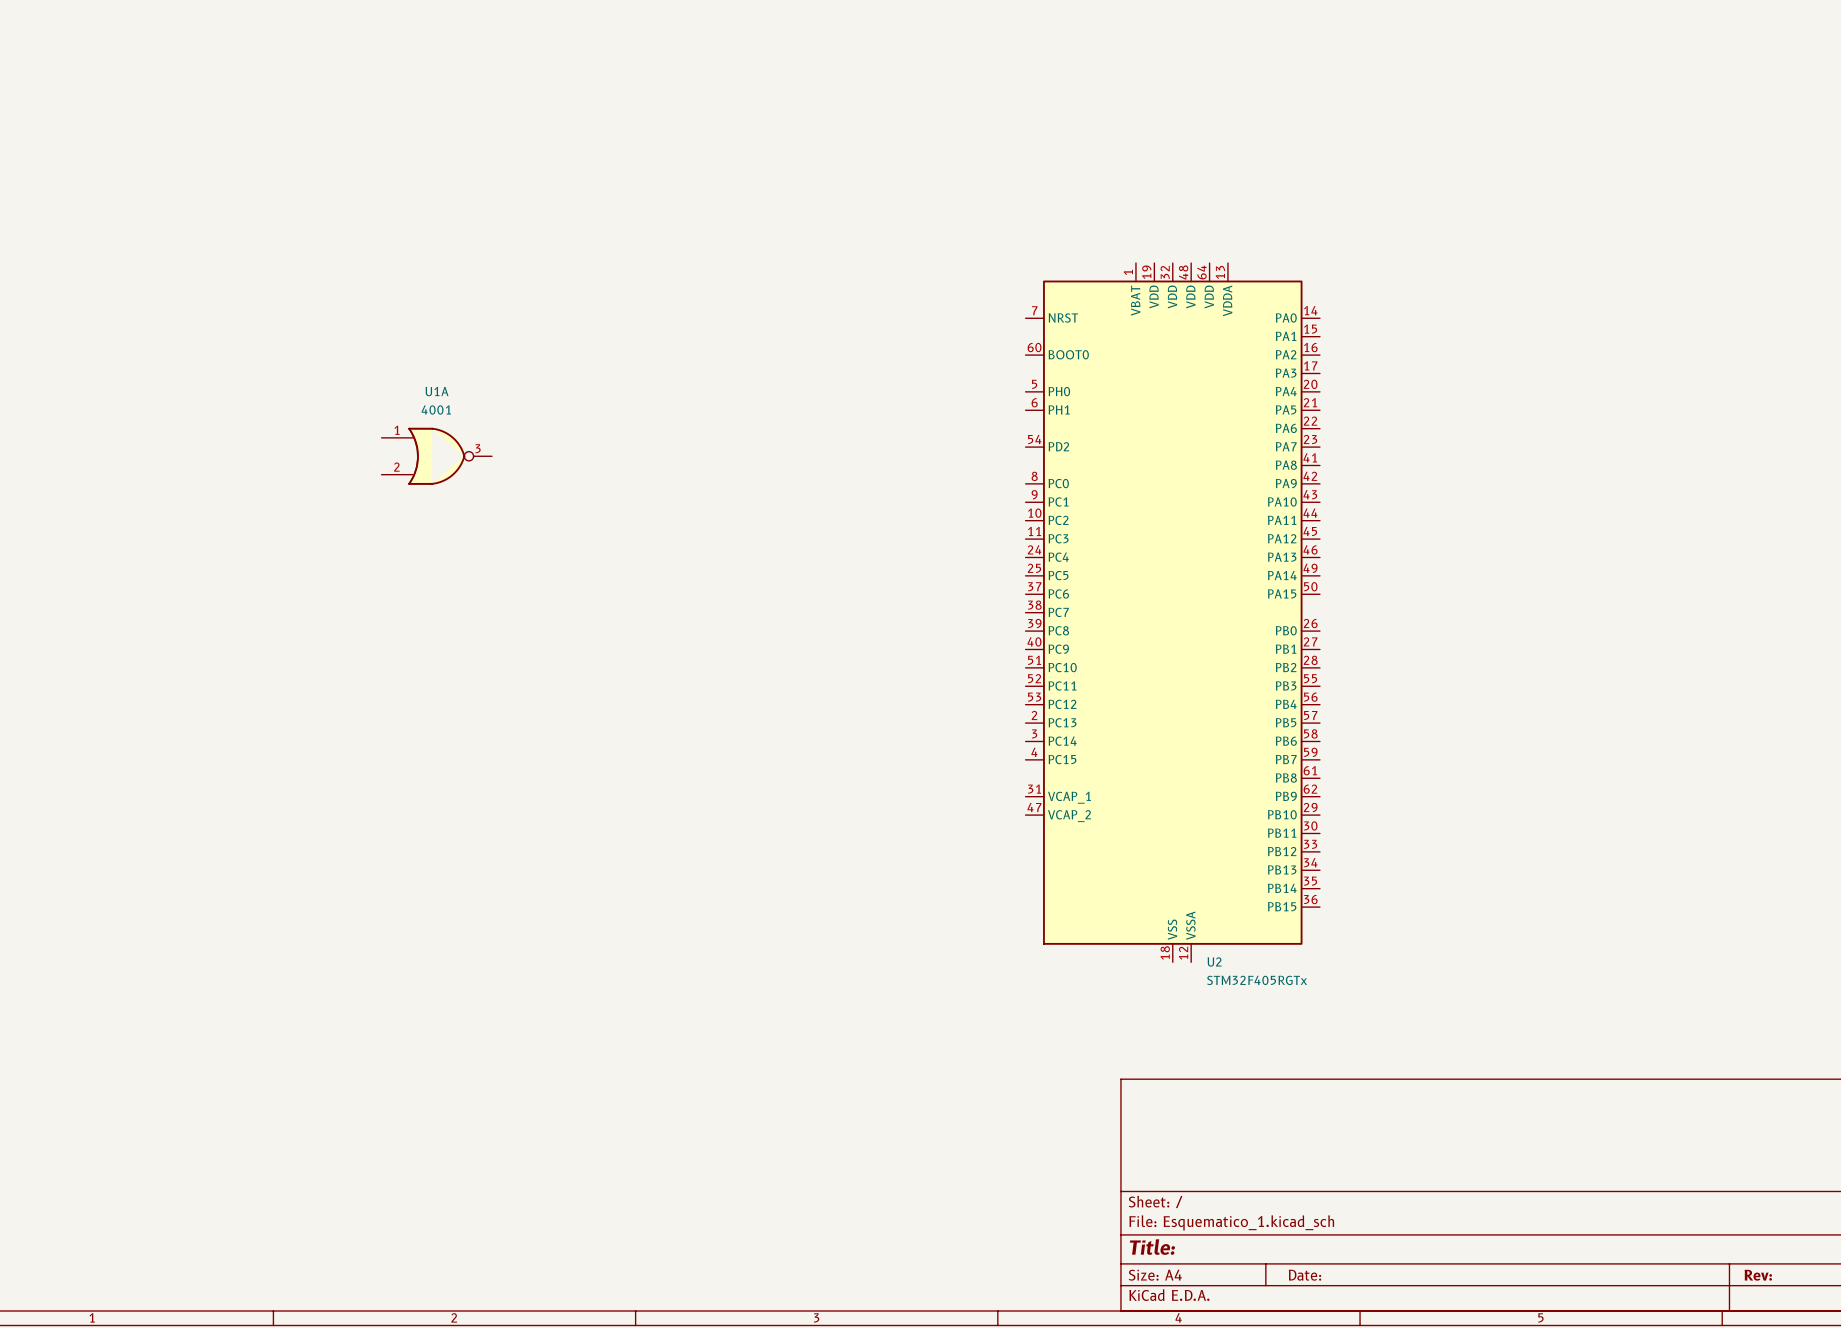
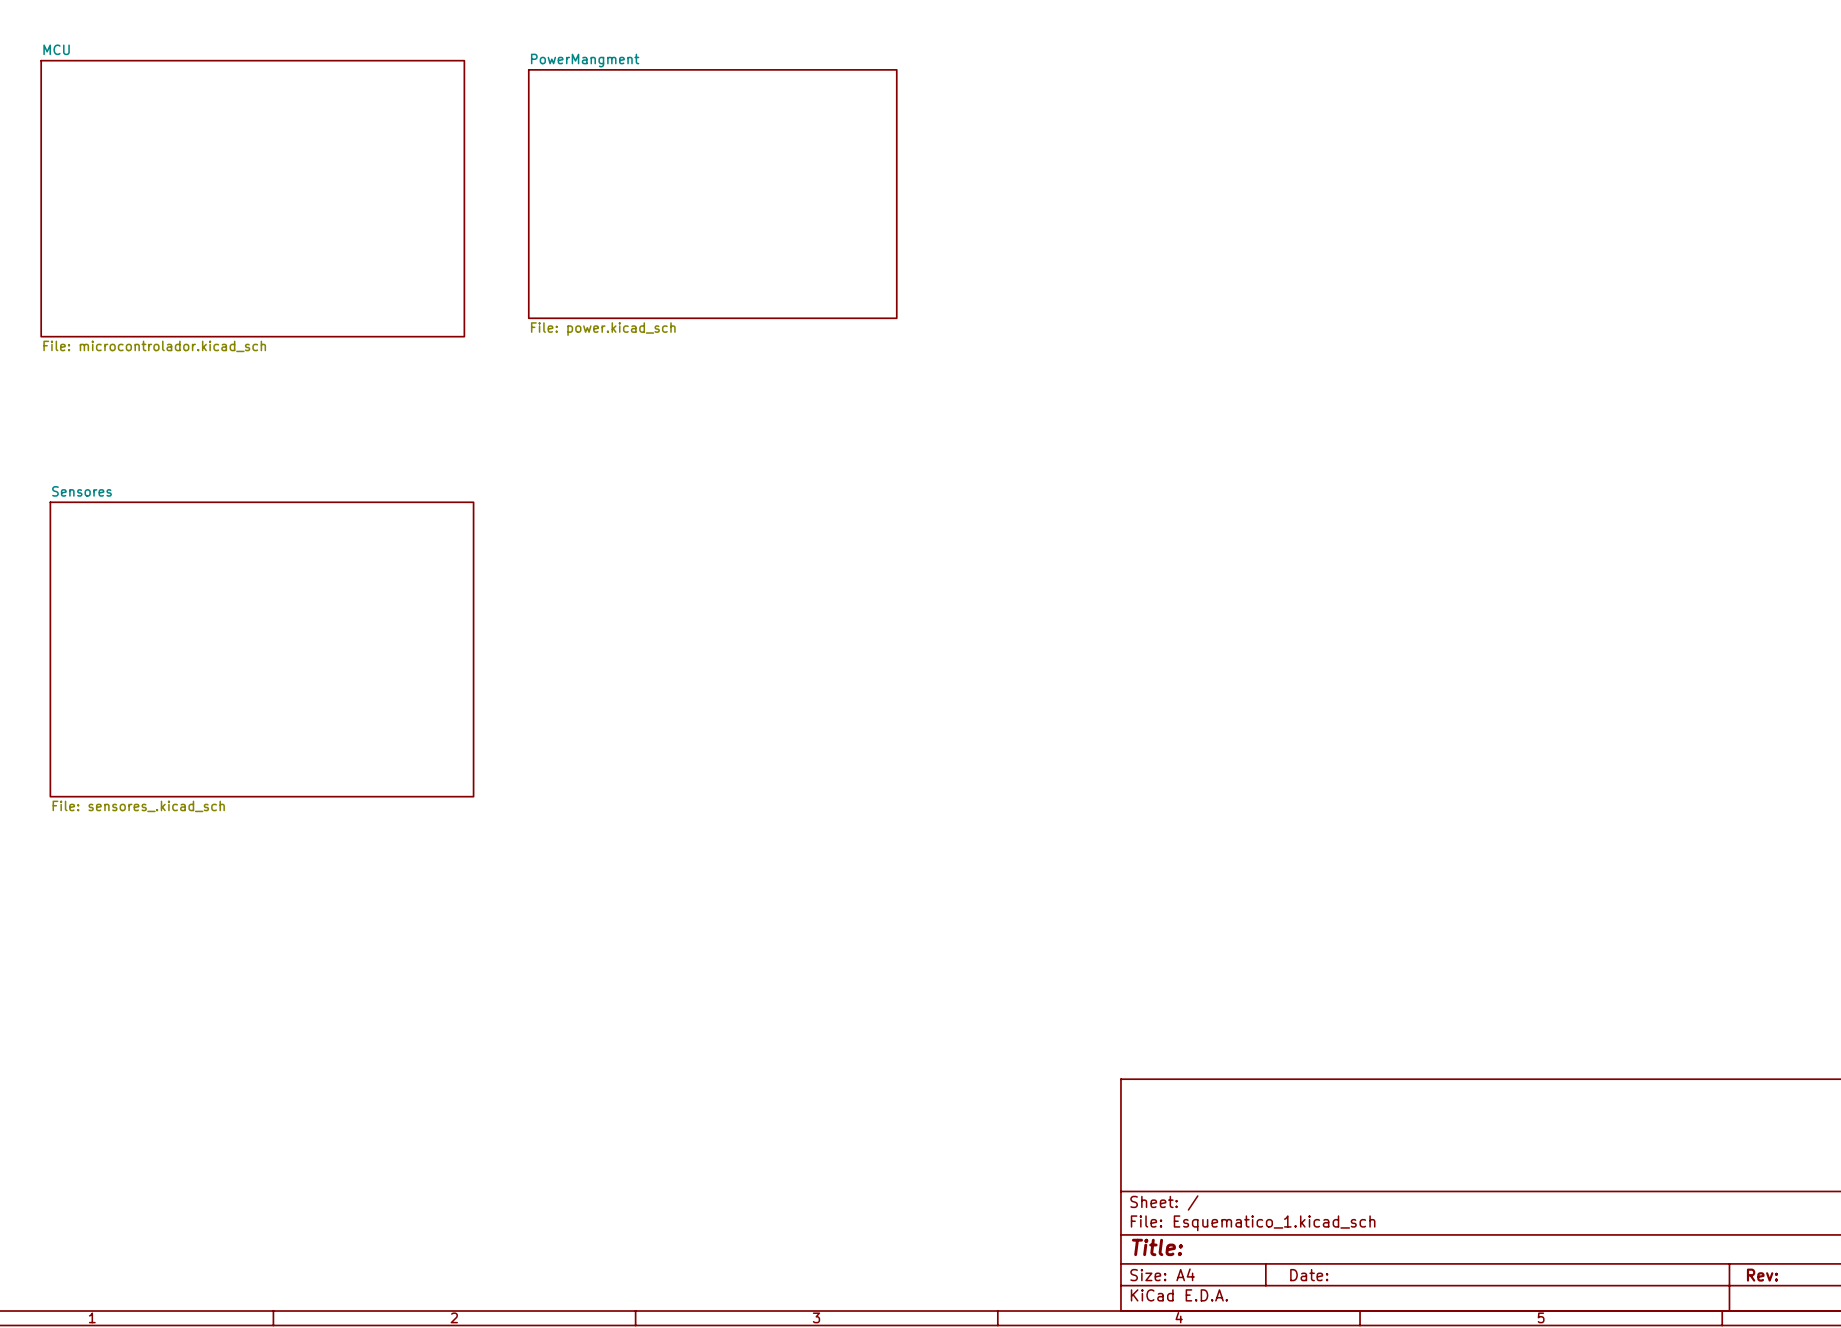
sheet PowerMangment: none -> File: power.kicad_sch (712, 194)
sheet MCU: none -> File: microcontrolador.kicad_sch (252, 198)
U1A: 4001 (436, 456) -> none
U2: STM32F405RGTx (1172, 612) -> none
sheet Sensores: none -> File: sensores_.kicad_sch (261, 649)

